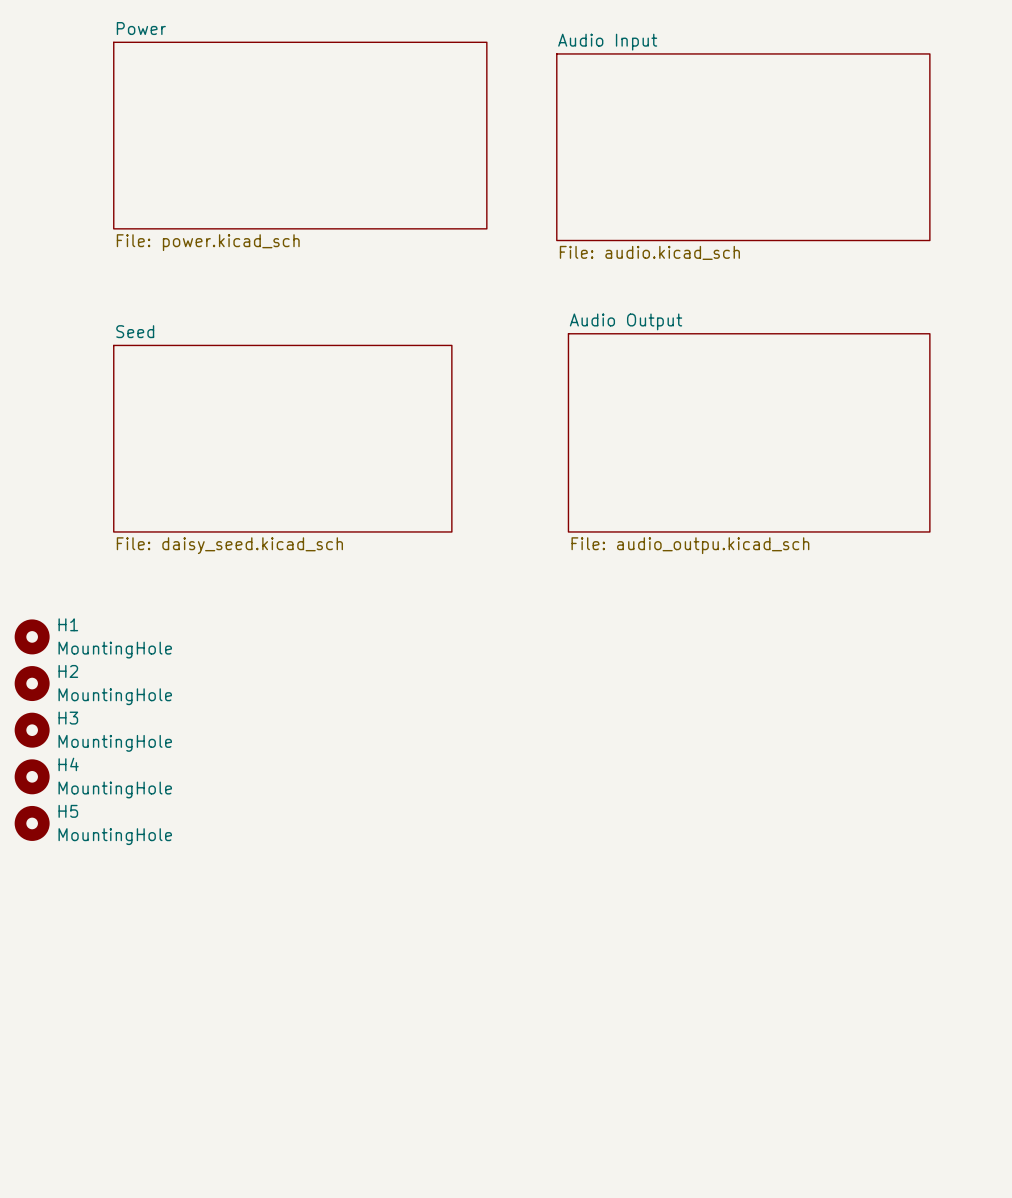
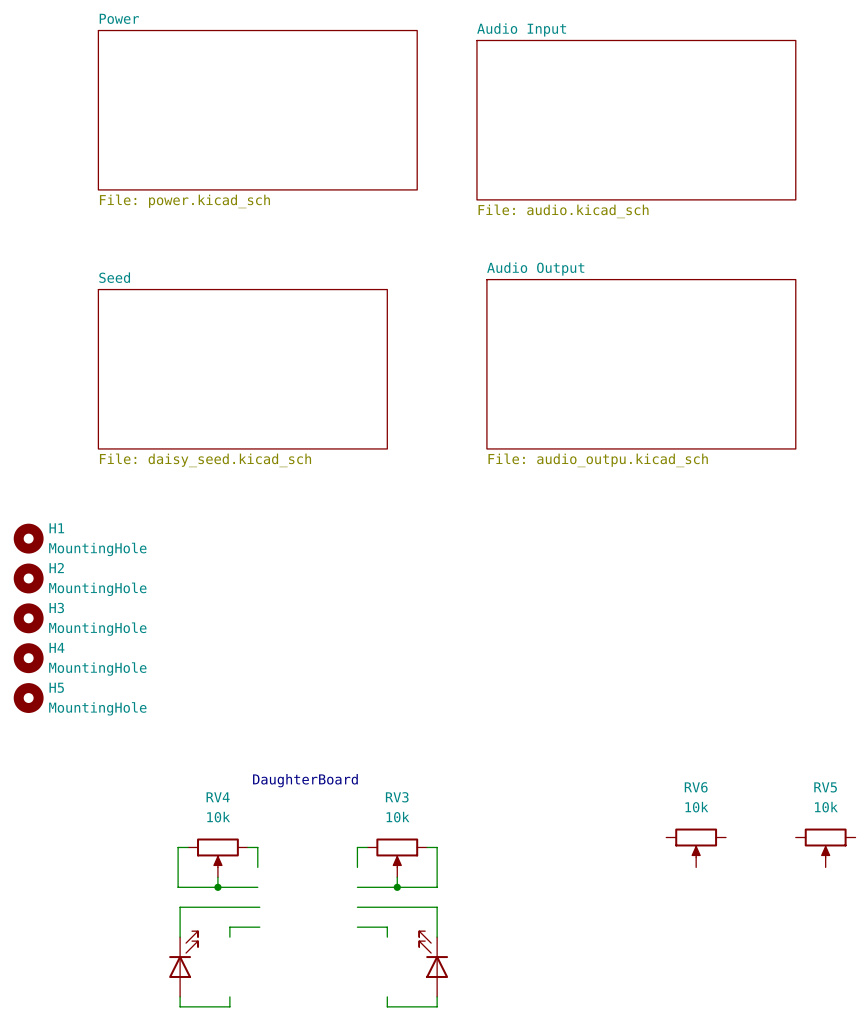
text: none -> DaughterBoard (305, 780)
wire: none -> (188, 847) (178, 847) (178, 887) (257, 887)
wire: none -> (247, 847) (257, 847) (257, 867)
wire: none -> (367, 847) (357, 847) (357, 867)
wire: none -> (427, 847) (437, 847) (437, 887) (357, 887)
RV6: none -> 10k (696, 847)
RV5: none -> 10k (825, 847)
RV4: none -> 10k (217, 857)
RV3: none -> 10k (397, 857)
wire: none -> (217, 877) (217, 887)
wire: none -> (397, 877) (397, 887)
junction: none -> (217, 887)
junction: none -> (397, 887)
wire: none -> (259, 907) (180, 907) (180, 937)
wire: none -> (357, 907) (437, 907) (437, 937)
wire: none -> (259, 927) (229, 927) (229, 937)
wire: none -> (357, 927) (387, 927) (387, 937)
part: none -> (183, 964)
part: none -> (433, 964)
wire: none -> (180, 996) (180, 1006) (229, 1006) (229, 996)
wire: none -> (387, 996) (387, 1006) (437, 1006) (437, 996)

